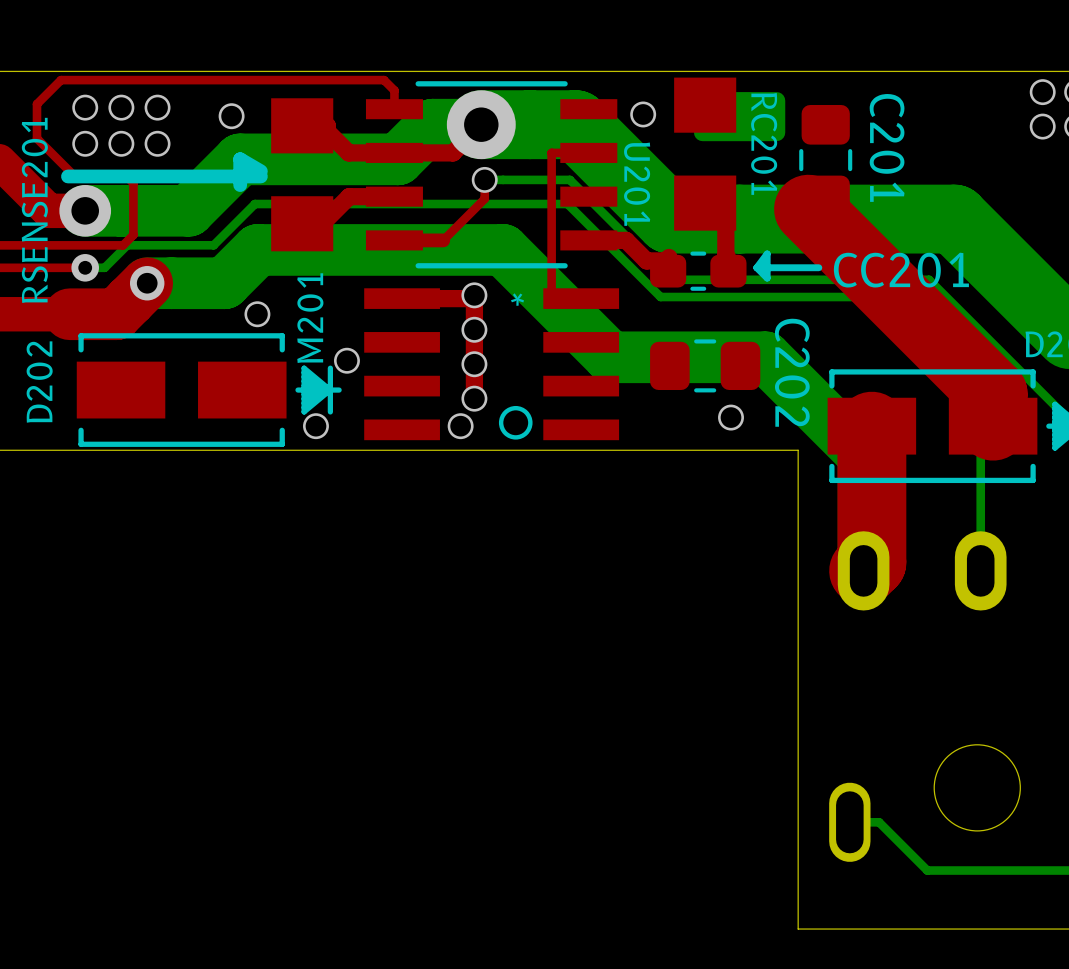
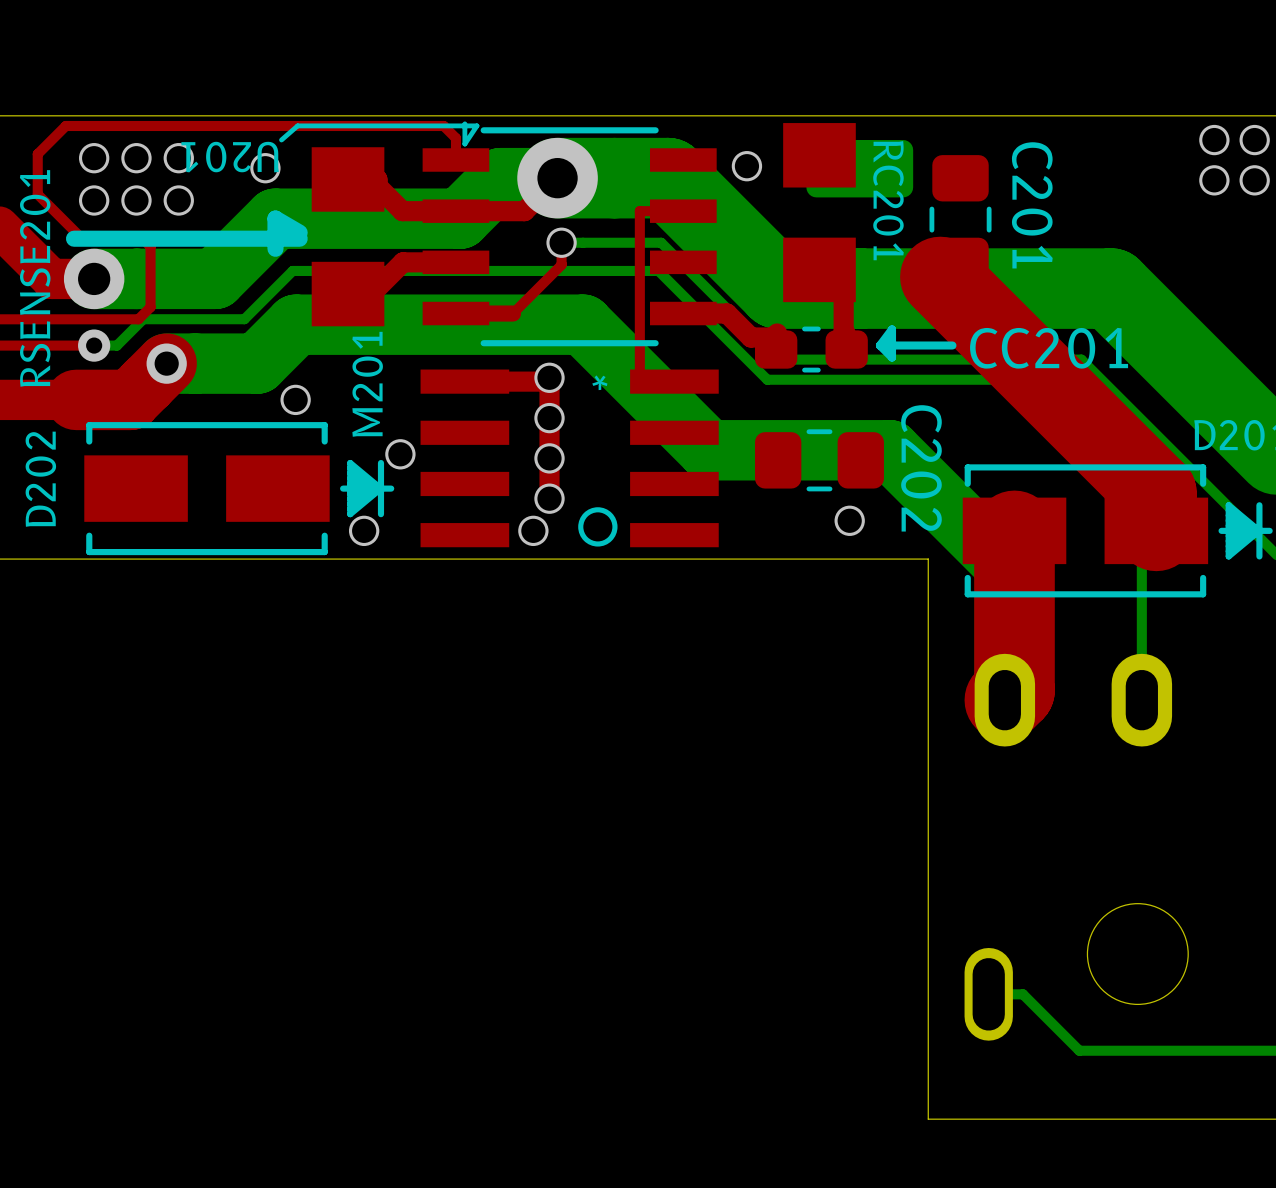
line: none -> (464, 123) (464, 144) (476, 125) (297, 125) (281, 139)
U201 name rotation: 0° (637, 184) -> 90° clockwise (230, 157)
U201 name position: U201 (637, 184) -> U201 (230, 157)
M201 name position: M201 (310, 318) -> M201 (367, 384)

